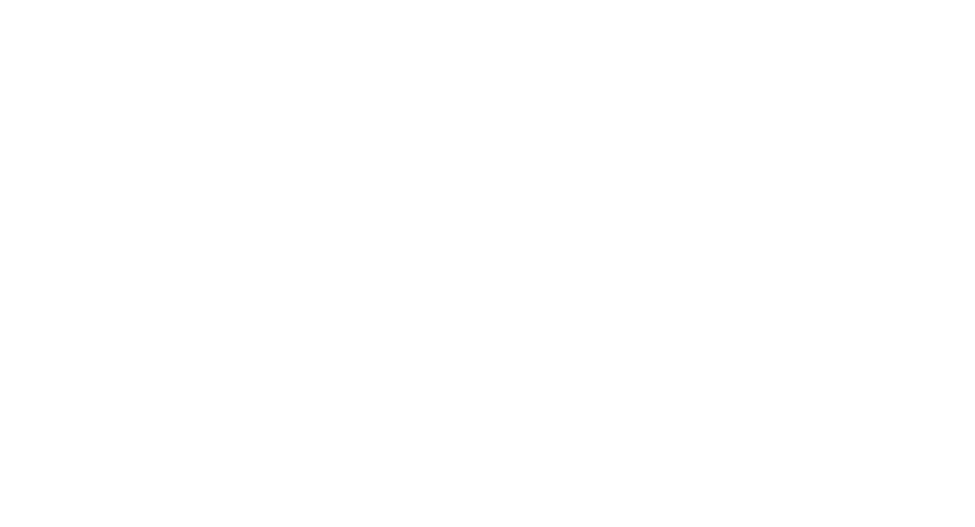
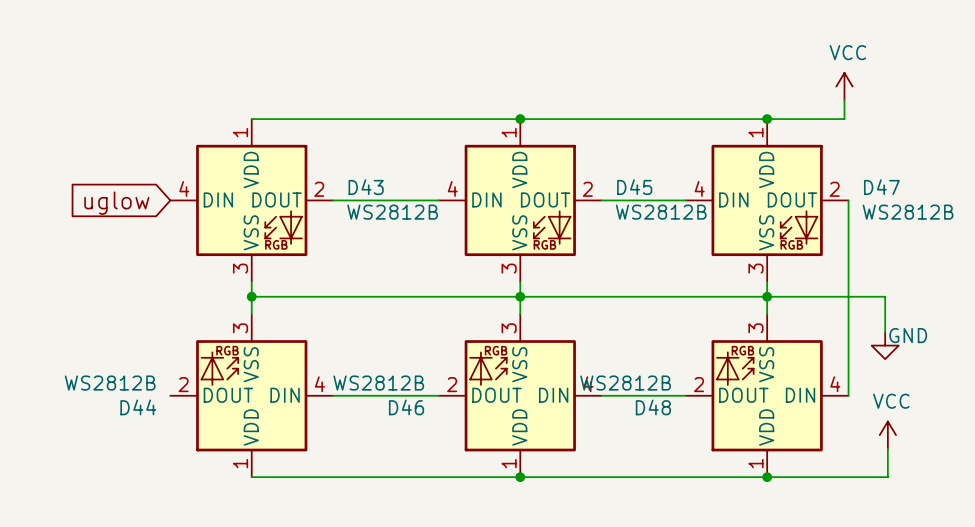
power symbol: none -> VCC (844, 86)
wire: none -> (844, 100) (844, 119) (251, 119)
junction: none -> (520, 119)
junction: none -> (767, 119)
D43: none -> WS2812B (251, 200)
wire: none -> (333, 200) (438, 200)
D45: none -> WS2812B (520, 200)
wire: none -> (601, 200) (685, 200)
D47: none -> WS2812B (767, 200)
wire: none -> (848, 200) (848, 395)
global label: none -> uglow (116, 203)
wire: none -> (251, 281) (251, 314)
wire: none -> (520, 281) (520, 314)
wire: none -> (767, 281) (767, 314)
wire: none -> (251, 296) (885, 296) (885, 332)
junction: none -> (251, 296)
junction: none -> (520, 296)
junction: none -> (767, 296)
power symbol: none -> GND (885, 345)
D44: none -> WS2812B (251, 395)
wire: none -> (333, 395) (438, 395)
D46: none -> WS2812B (520, 395)
wire: none -> (601, 395) (685, 395)
D48: none -> WS2812B (767, 395)
power symbol: none -> VCC (887, 435)
wire: none -> (887, 448) (887, 477) (251, 477)
junction: none -> (520, 477)
junction: none -> (767, 477)

